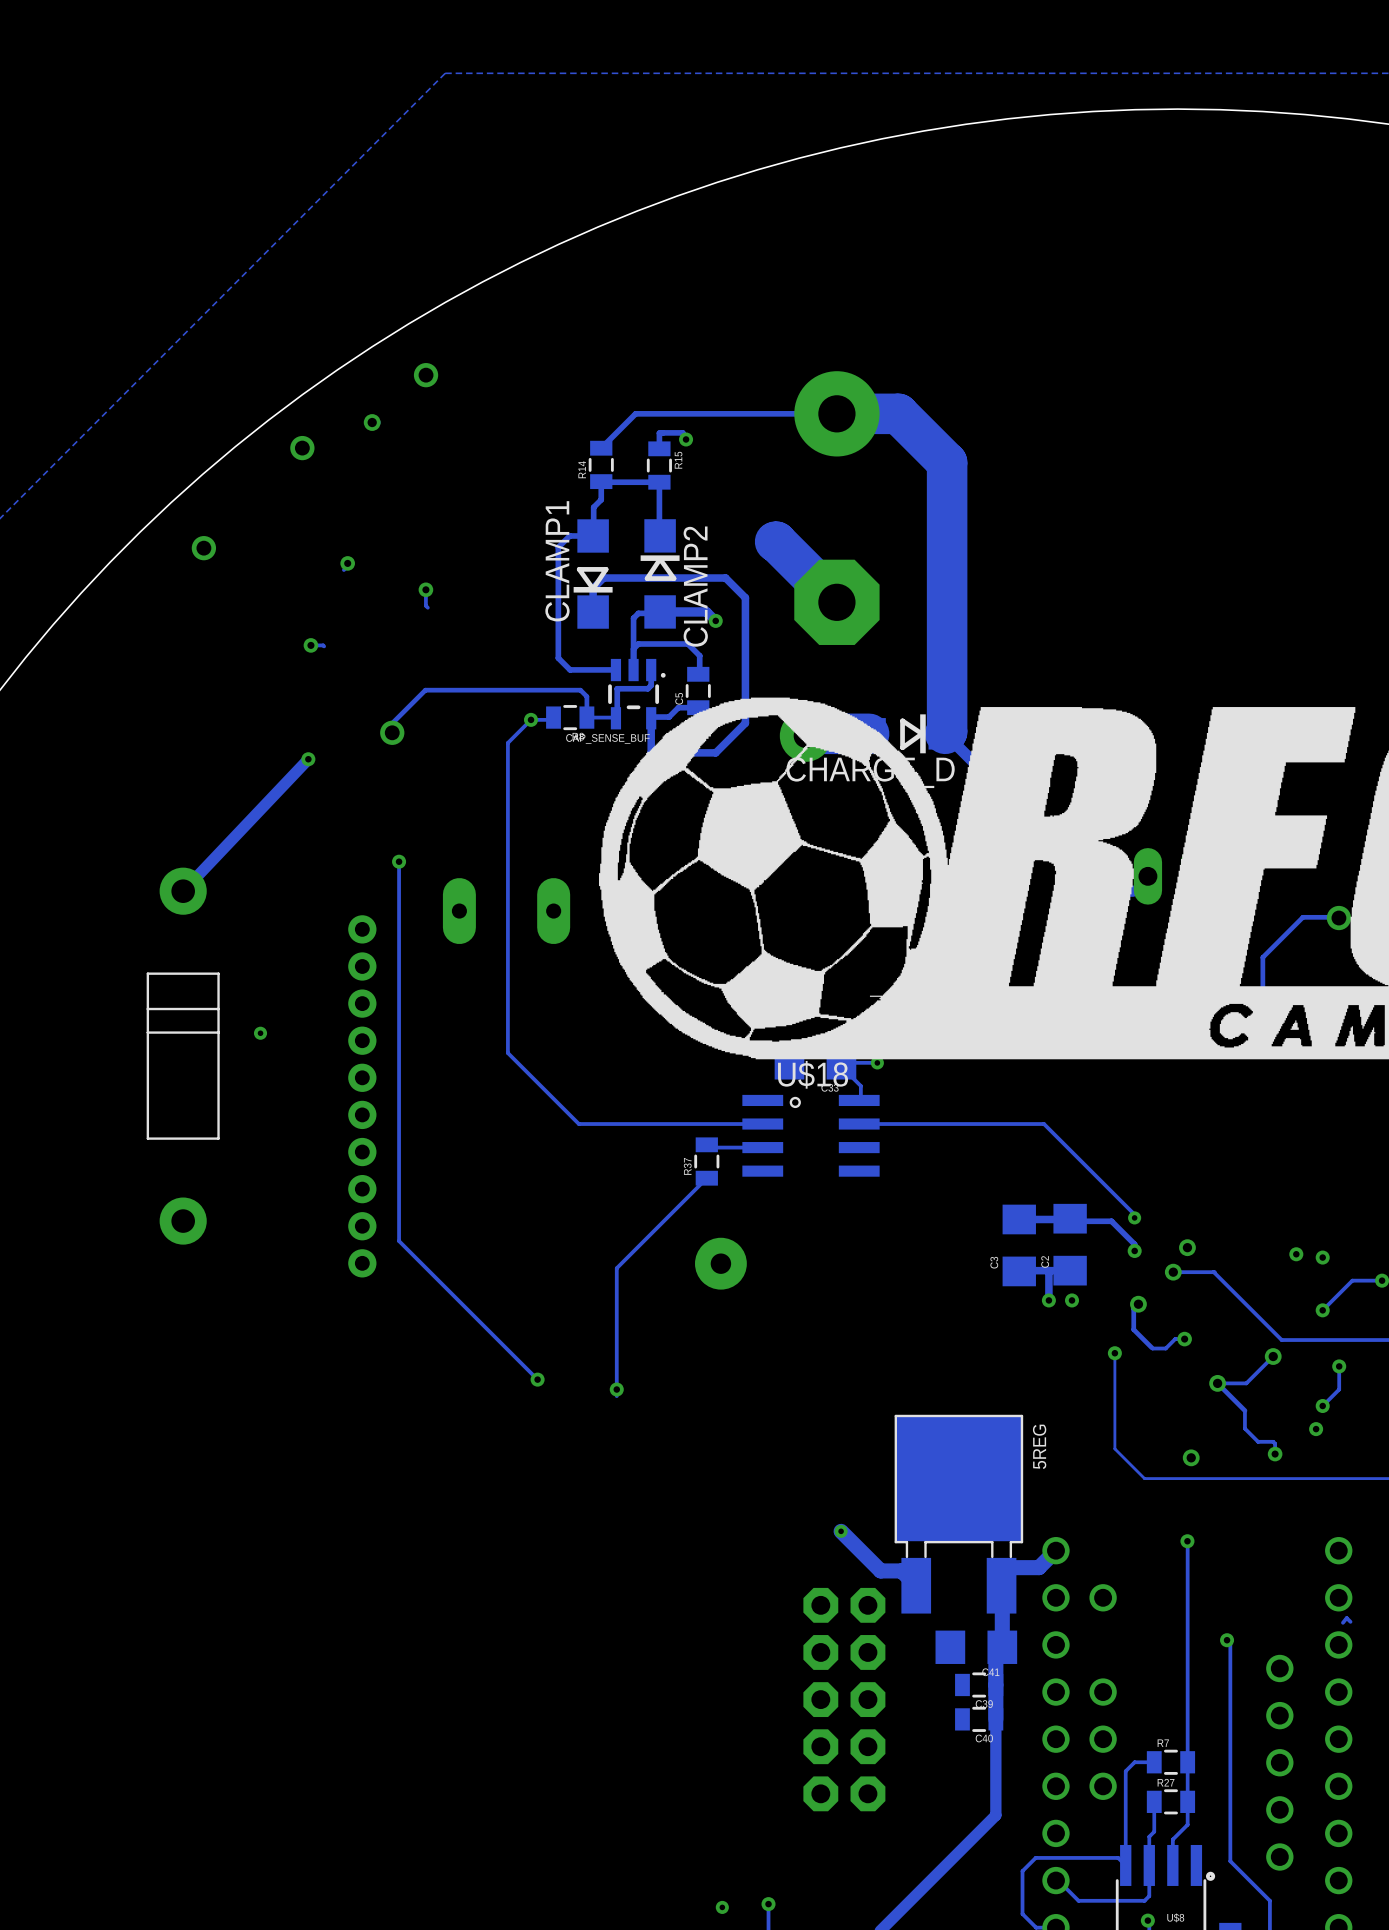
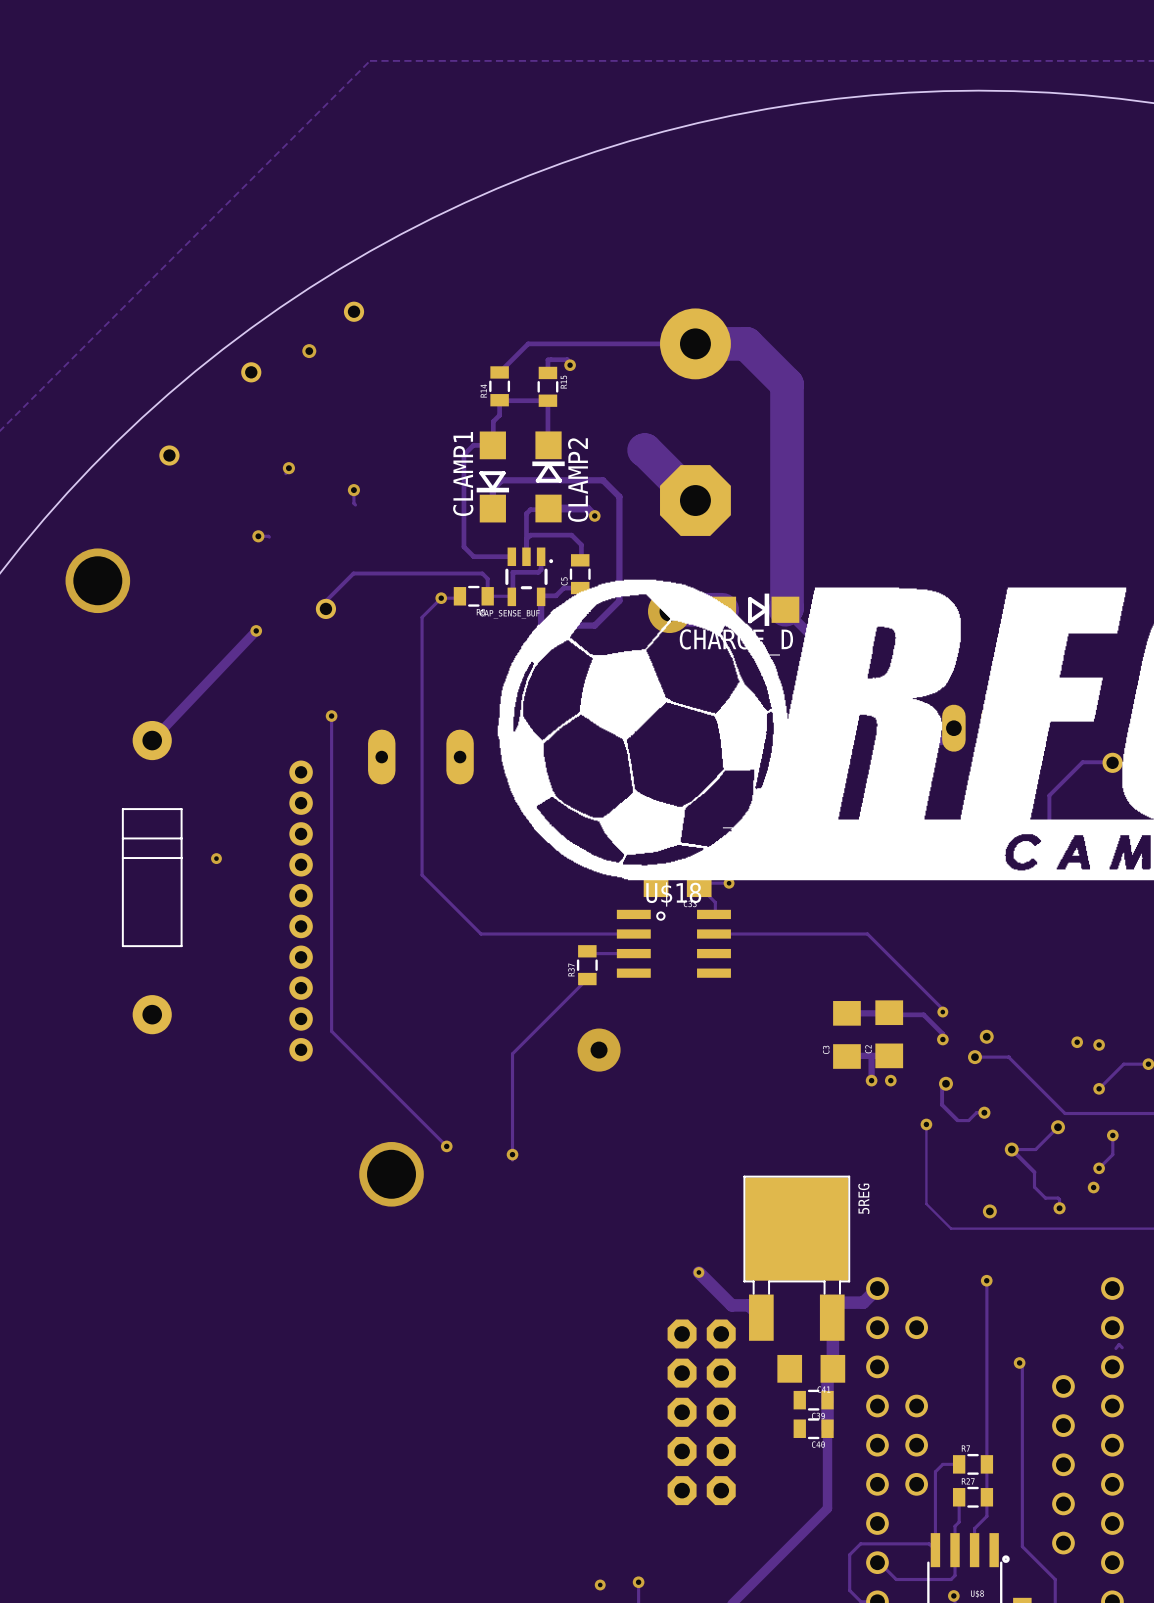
via: none -> (97, 580)
via: none -> (391, 1174)

